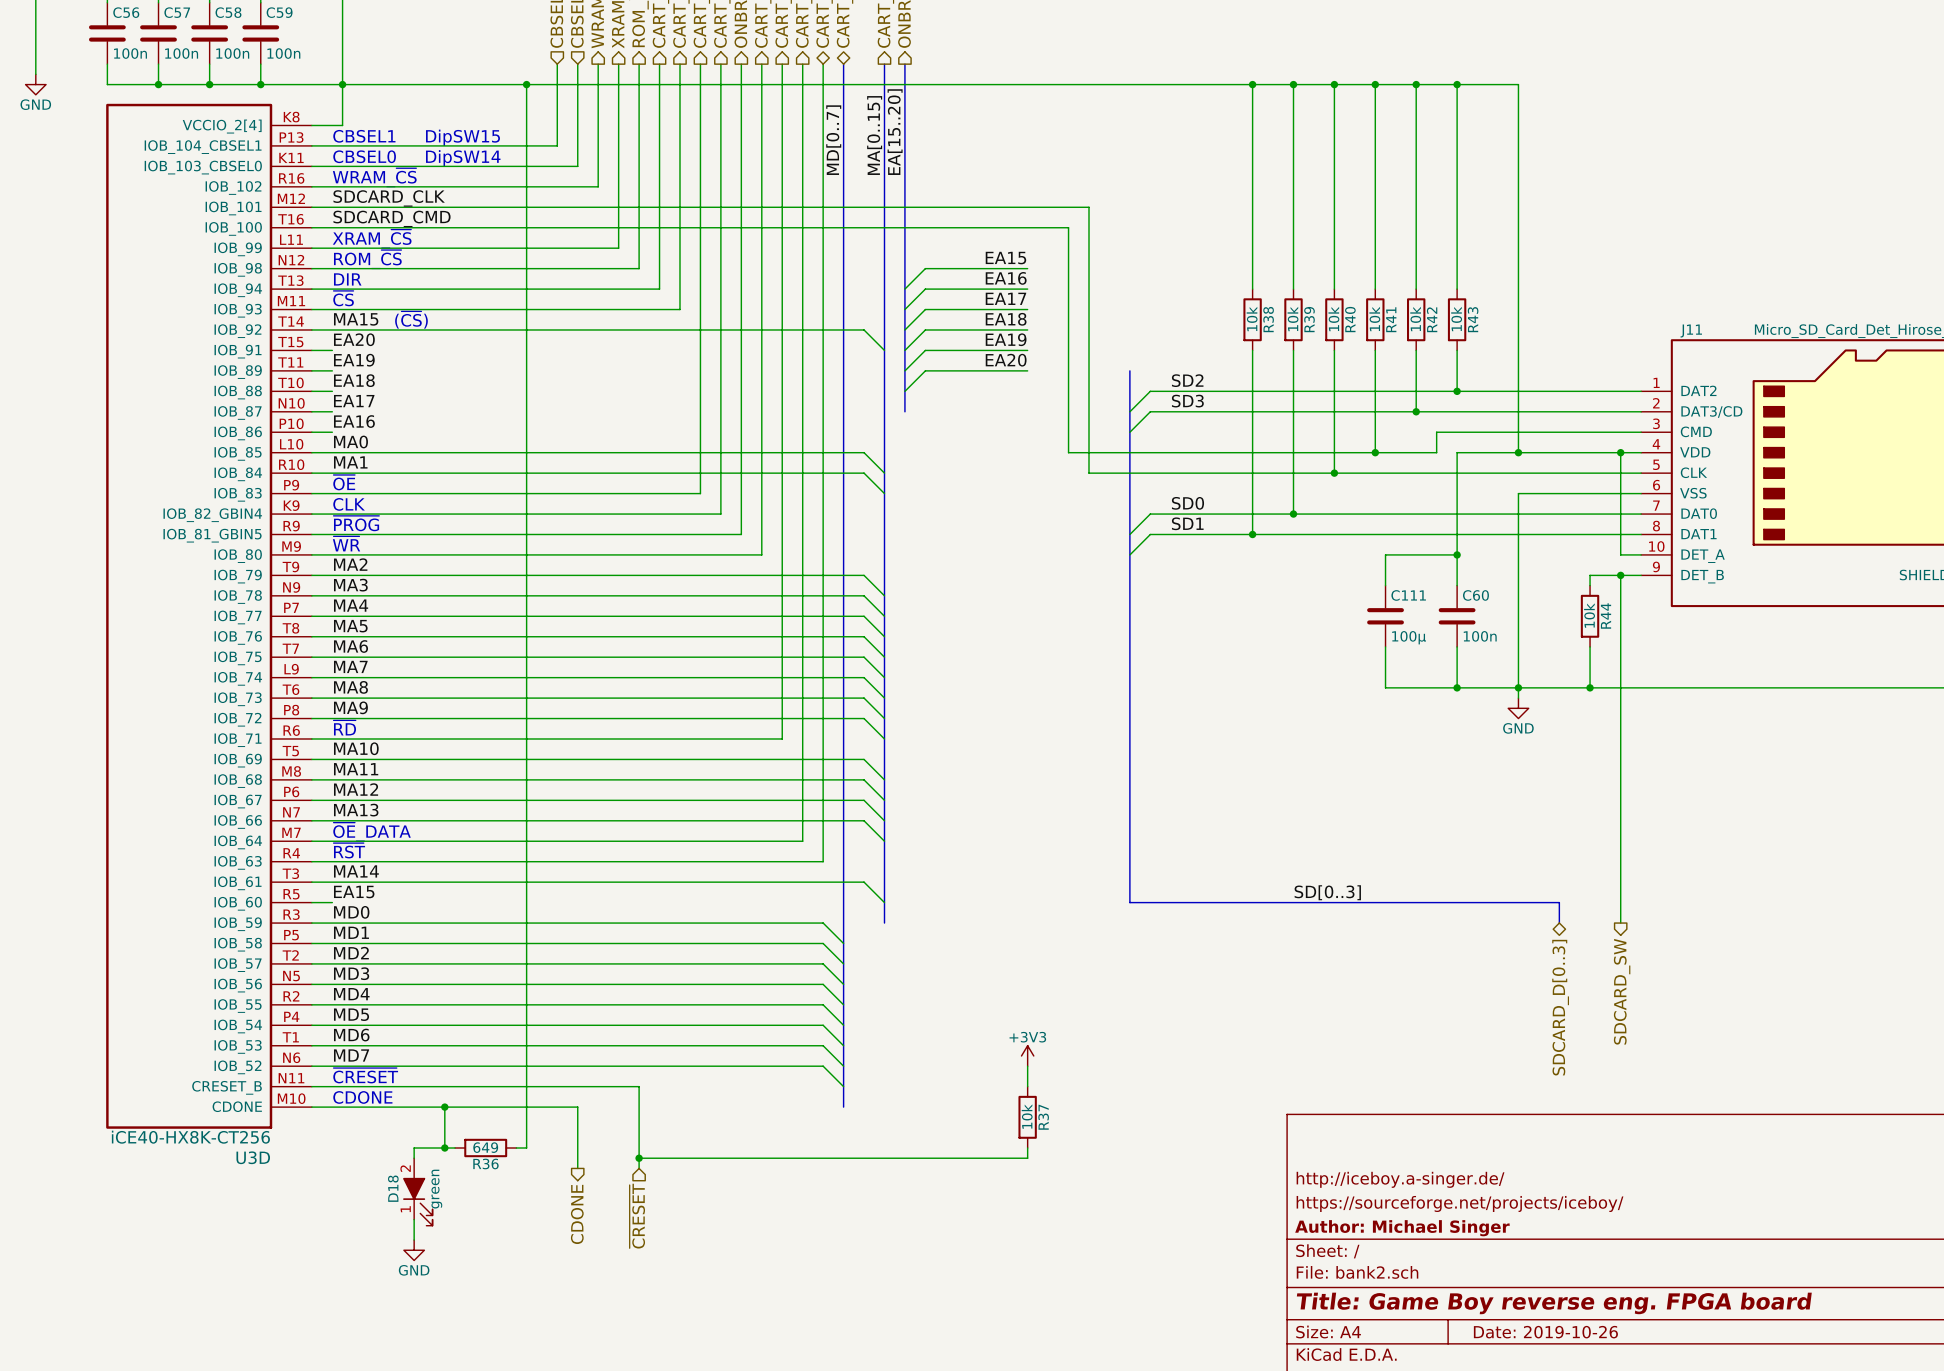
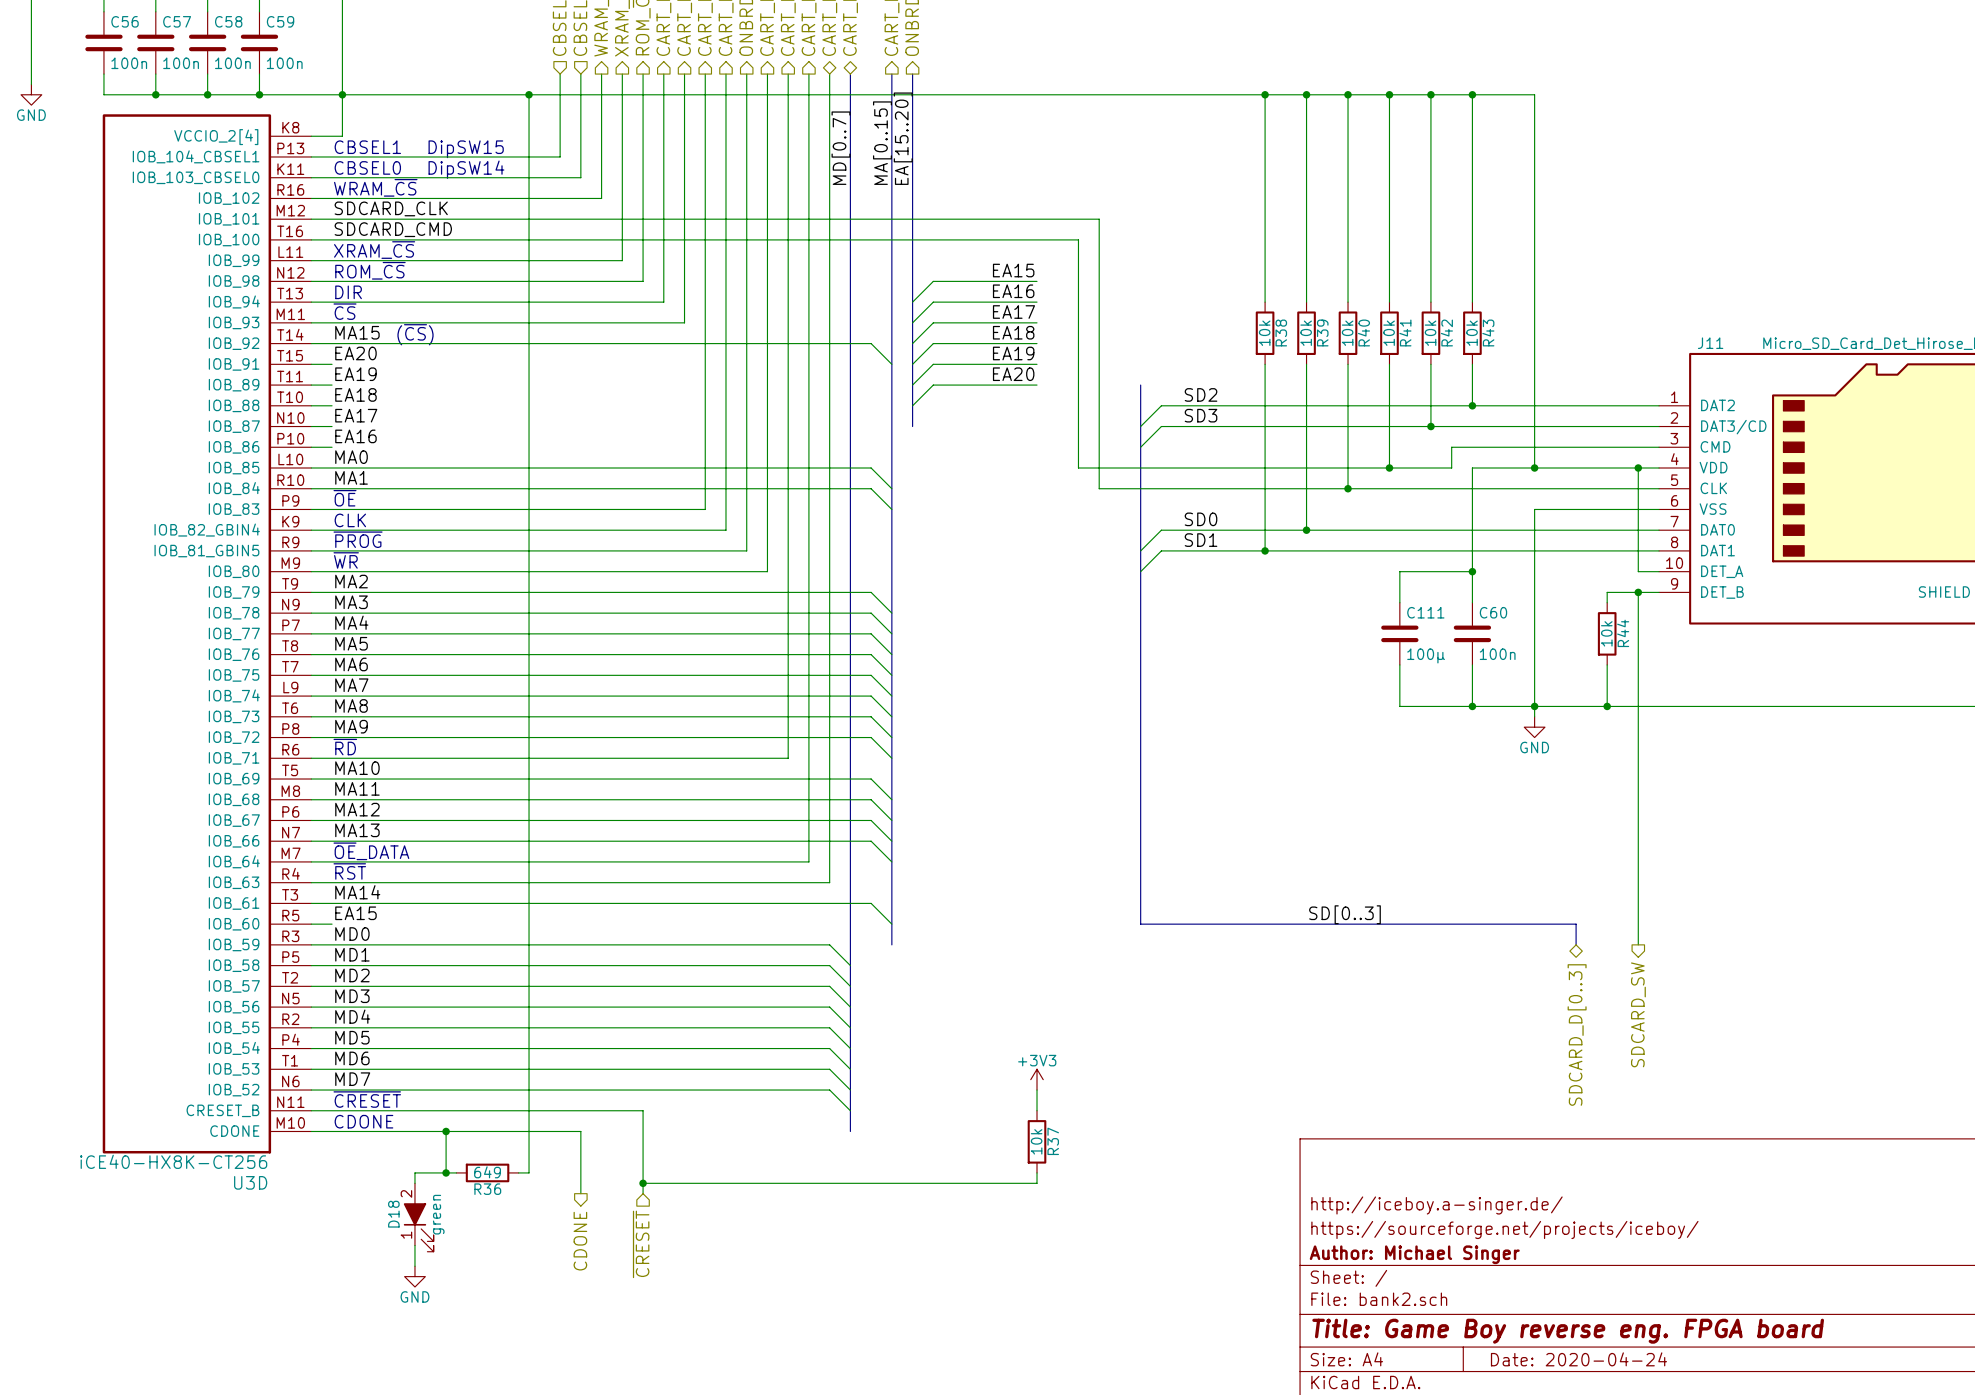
title block: Date: 2019-10-26 (1545, 1332) -> Date: 2020-04-24 (1578, 1359)

